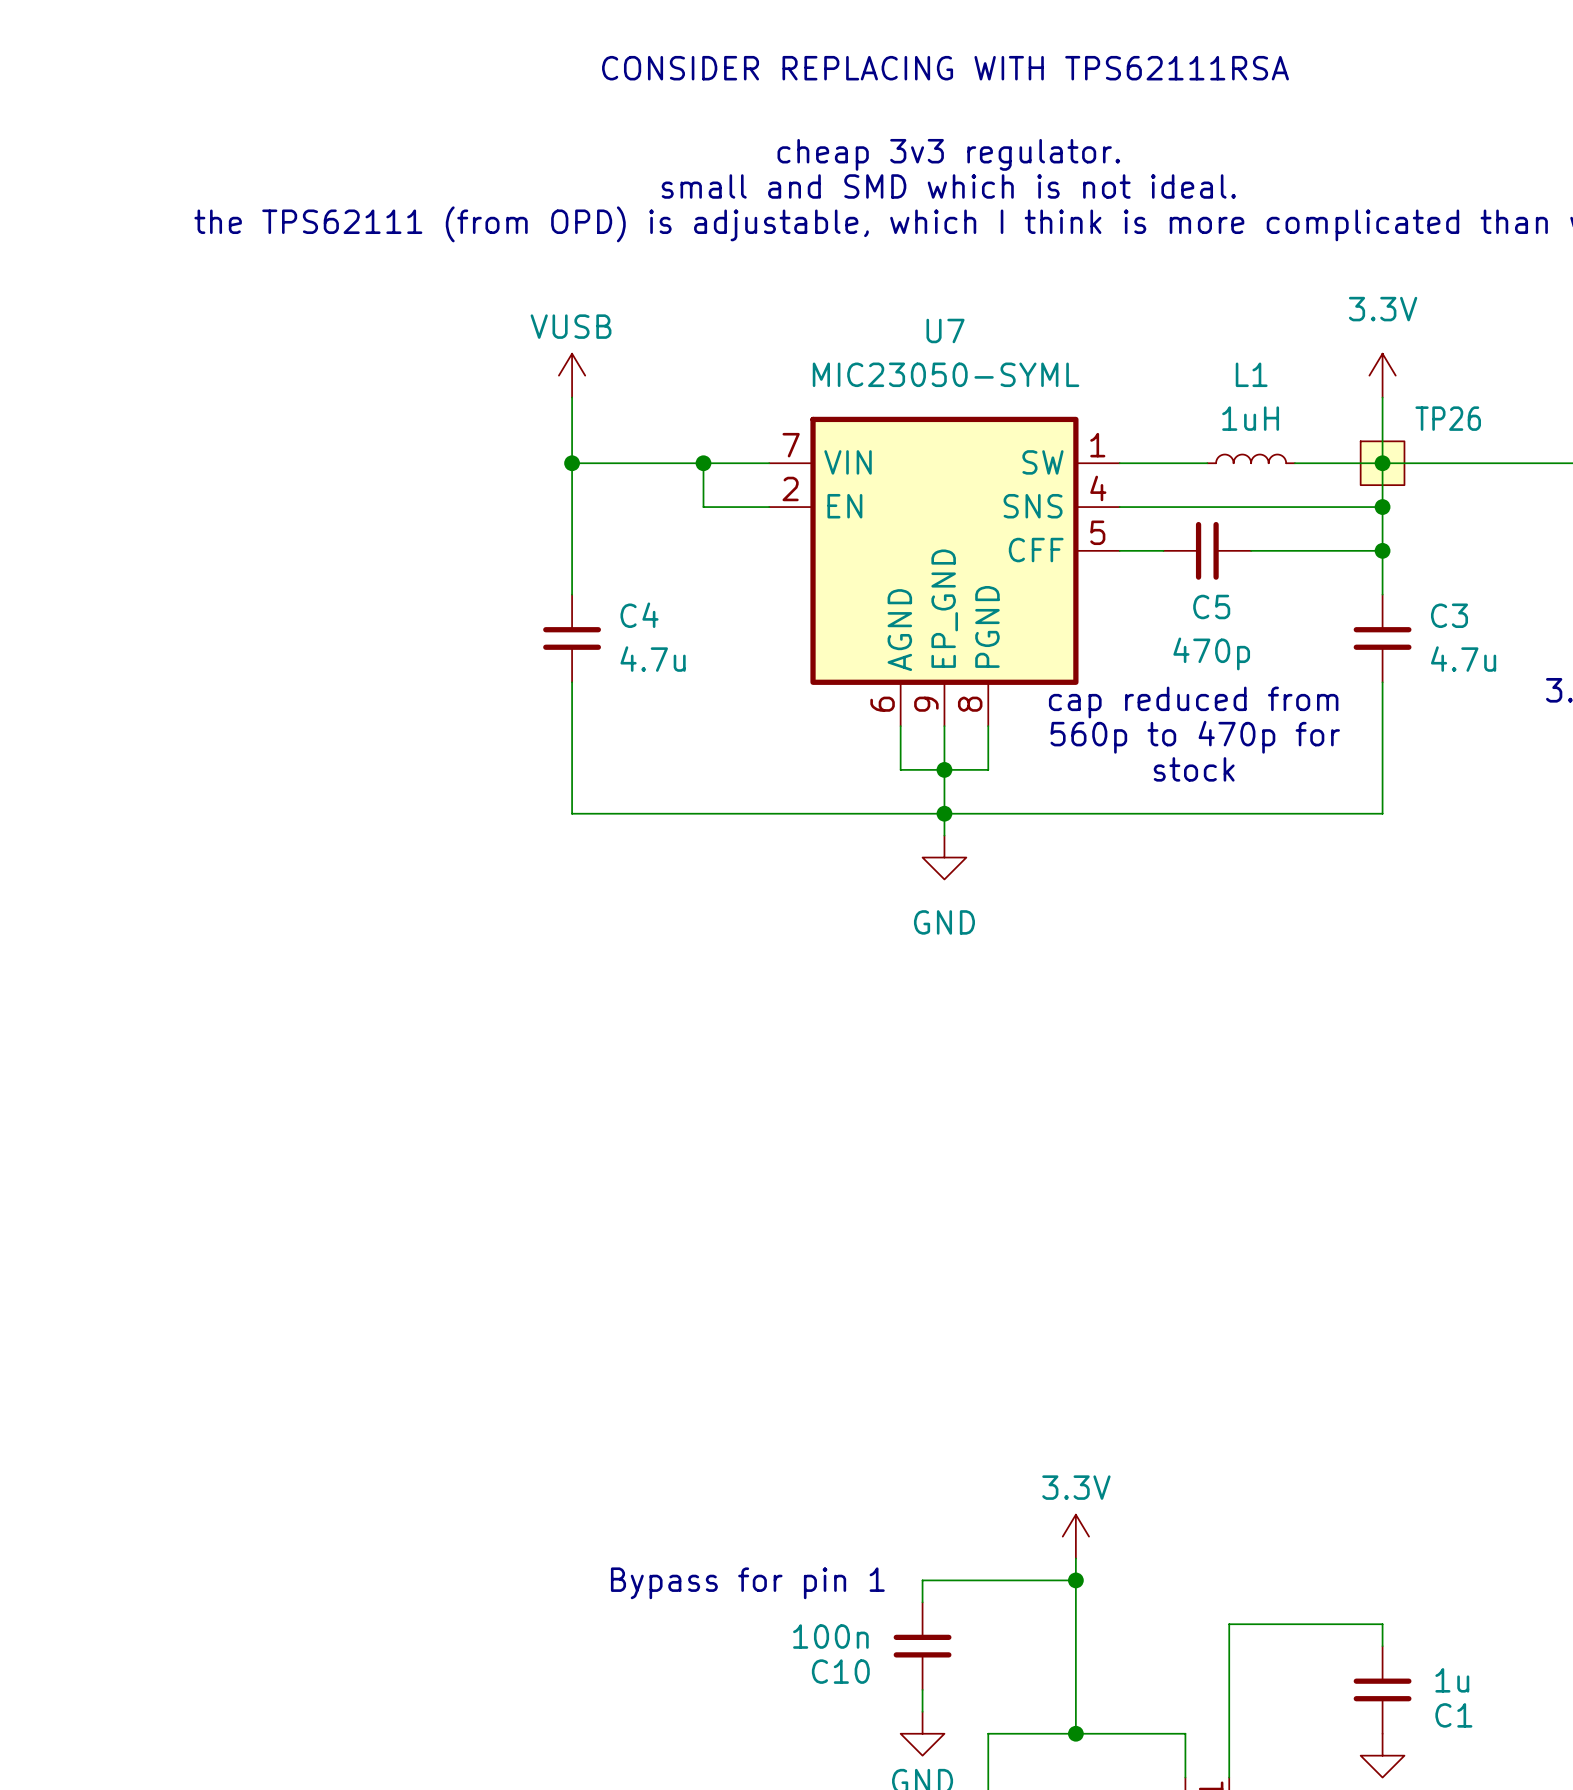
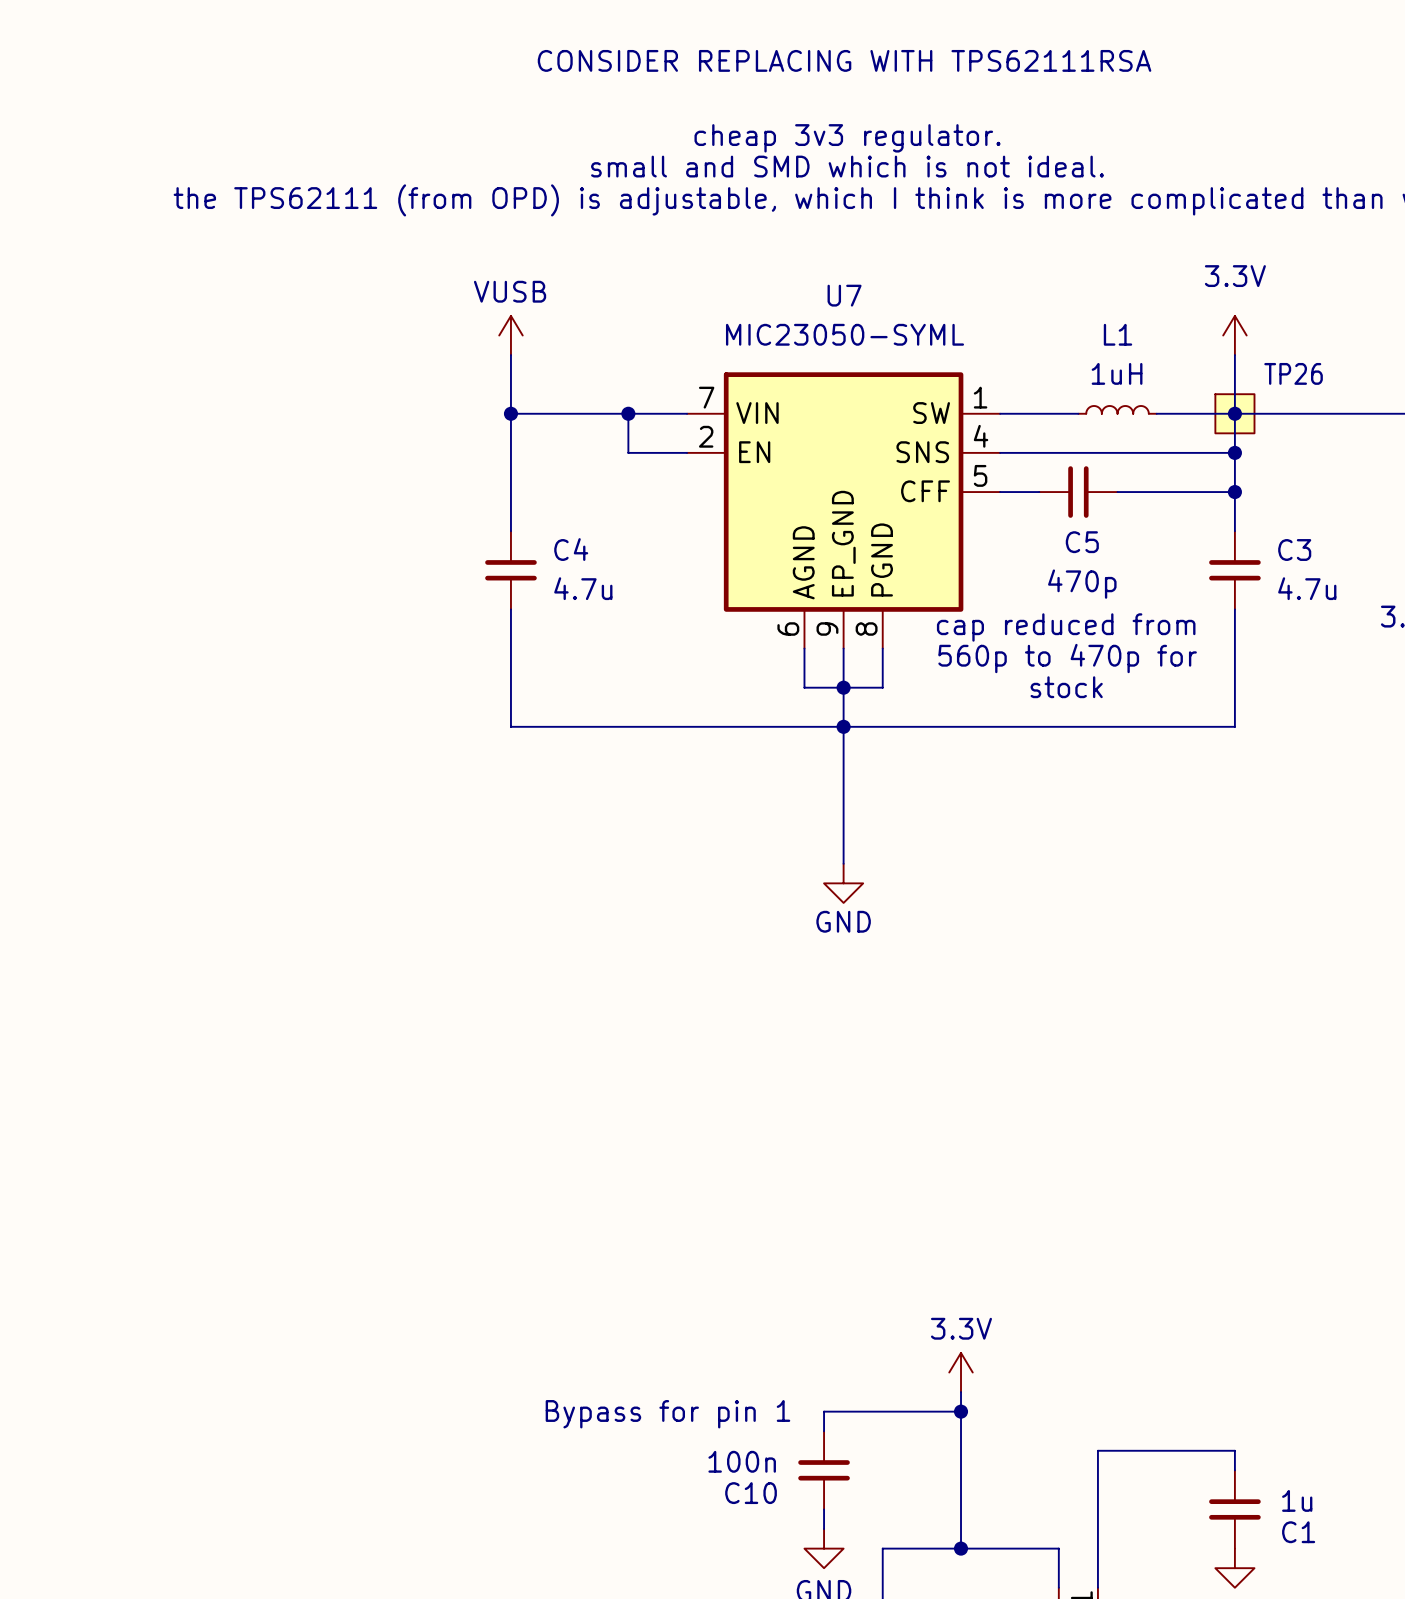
wire: none -> (843, 746) (843, 863)
power symbol position: GND (944, 857) -> GND (843, 883)
power symbol text position: GND (944, 922) -> GND (843, 921)

